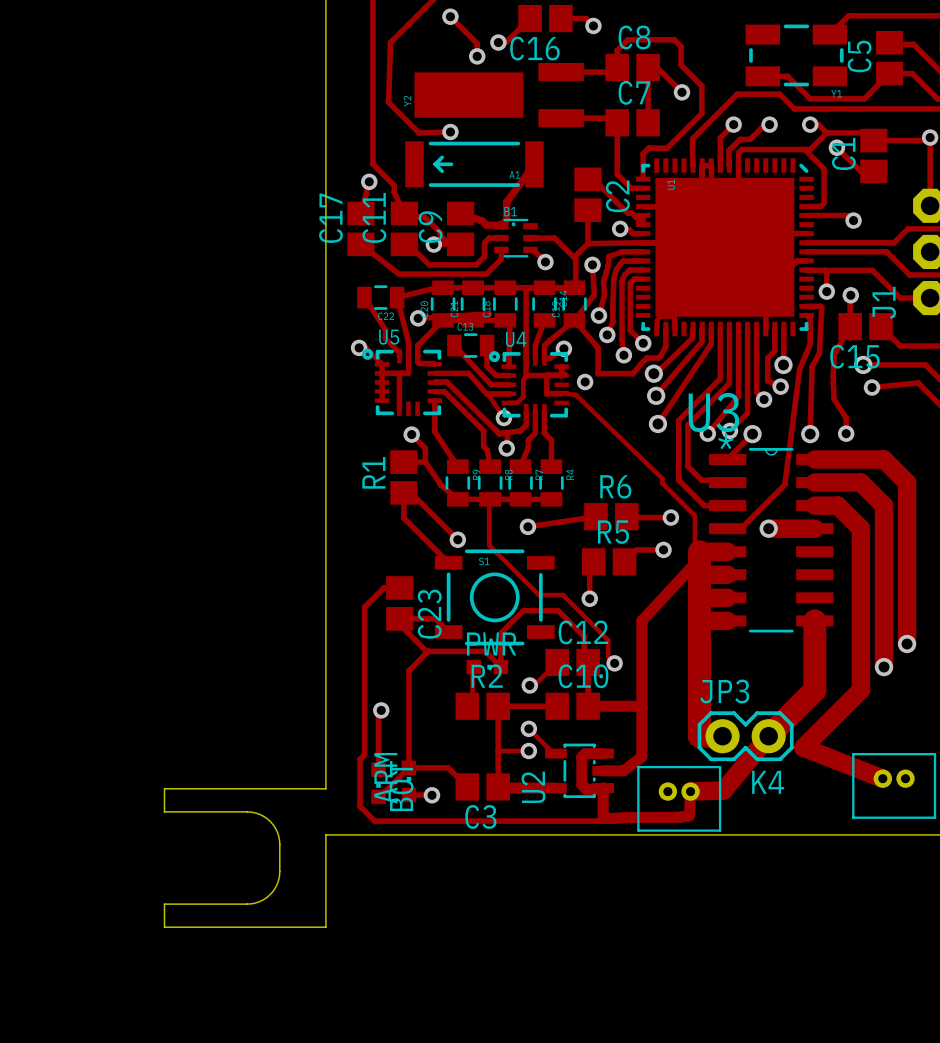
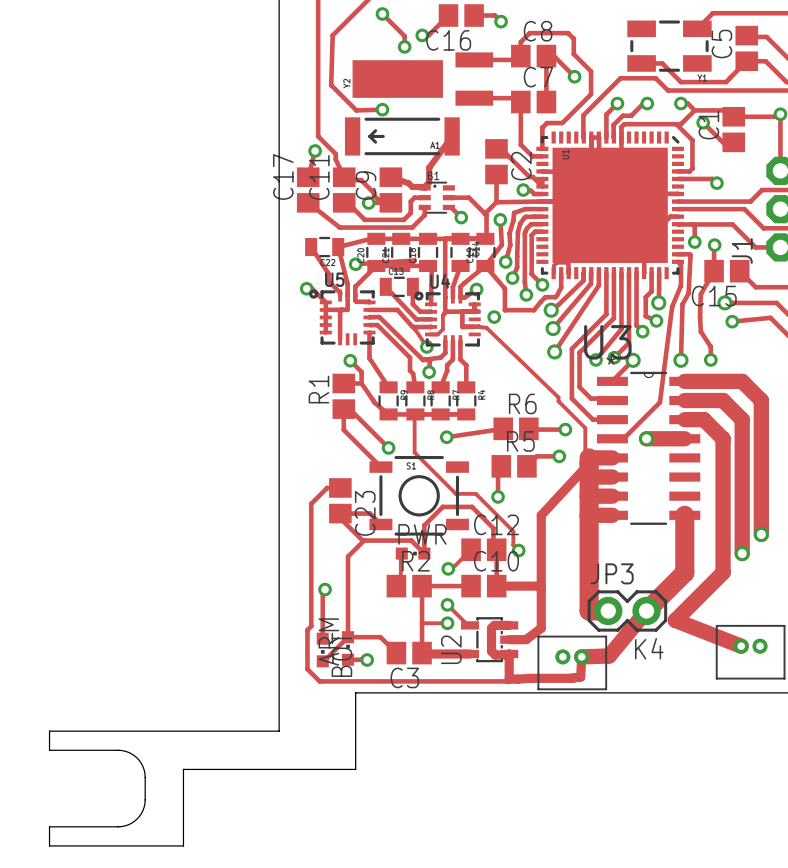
board edge: (325, 788) (164, 788) (164, 811) (255, 812) (270, 821) (278, 836) (278, 879) (273, 891) (263, 899) (247, 904) (164, 904) (164, 927) (210, 927) -> (279, 731) (49, 731) (49, 750) (125, 751) (139, 760) (145, 777) (144, 806) (134, 821) (121, 826) (49, 826) (49, 845) (183, 845) (183, 769)
board edge: (325, 834) (418, 834) -> (279, 769) (355, 769) (355, 692)
board edge: (325, 881) (325, 927) -> (279, 654) (279, 692)

